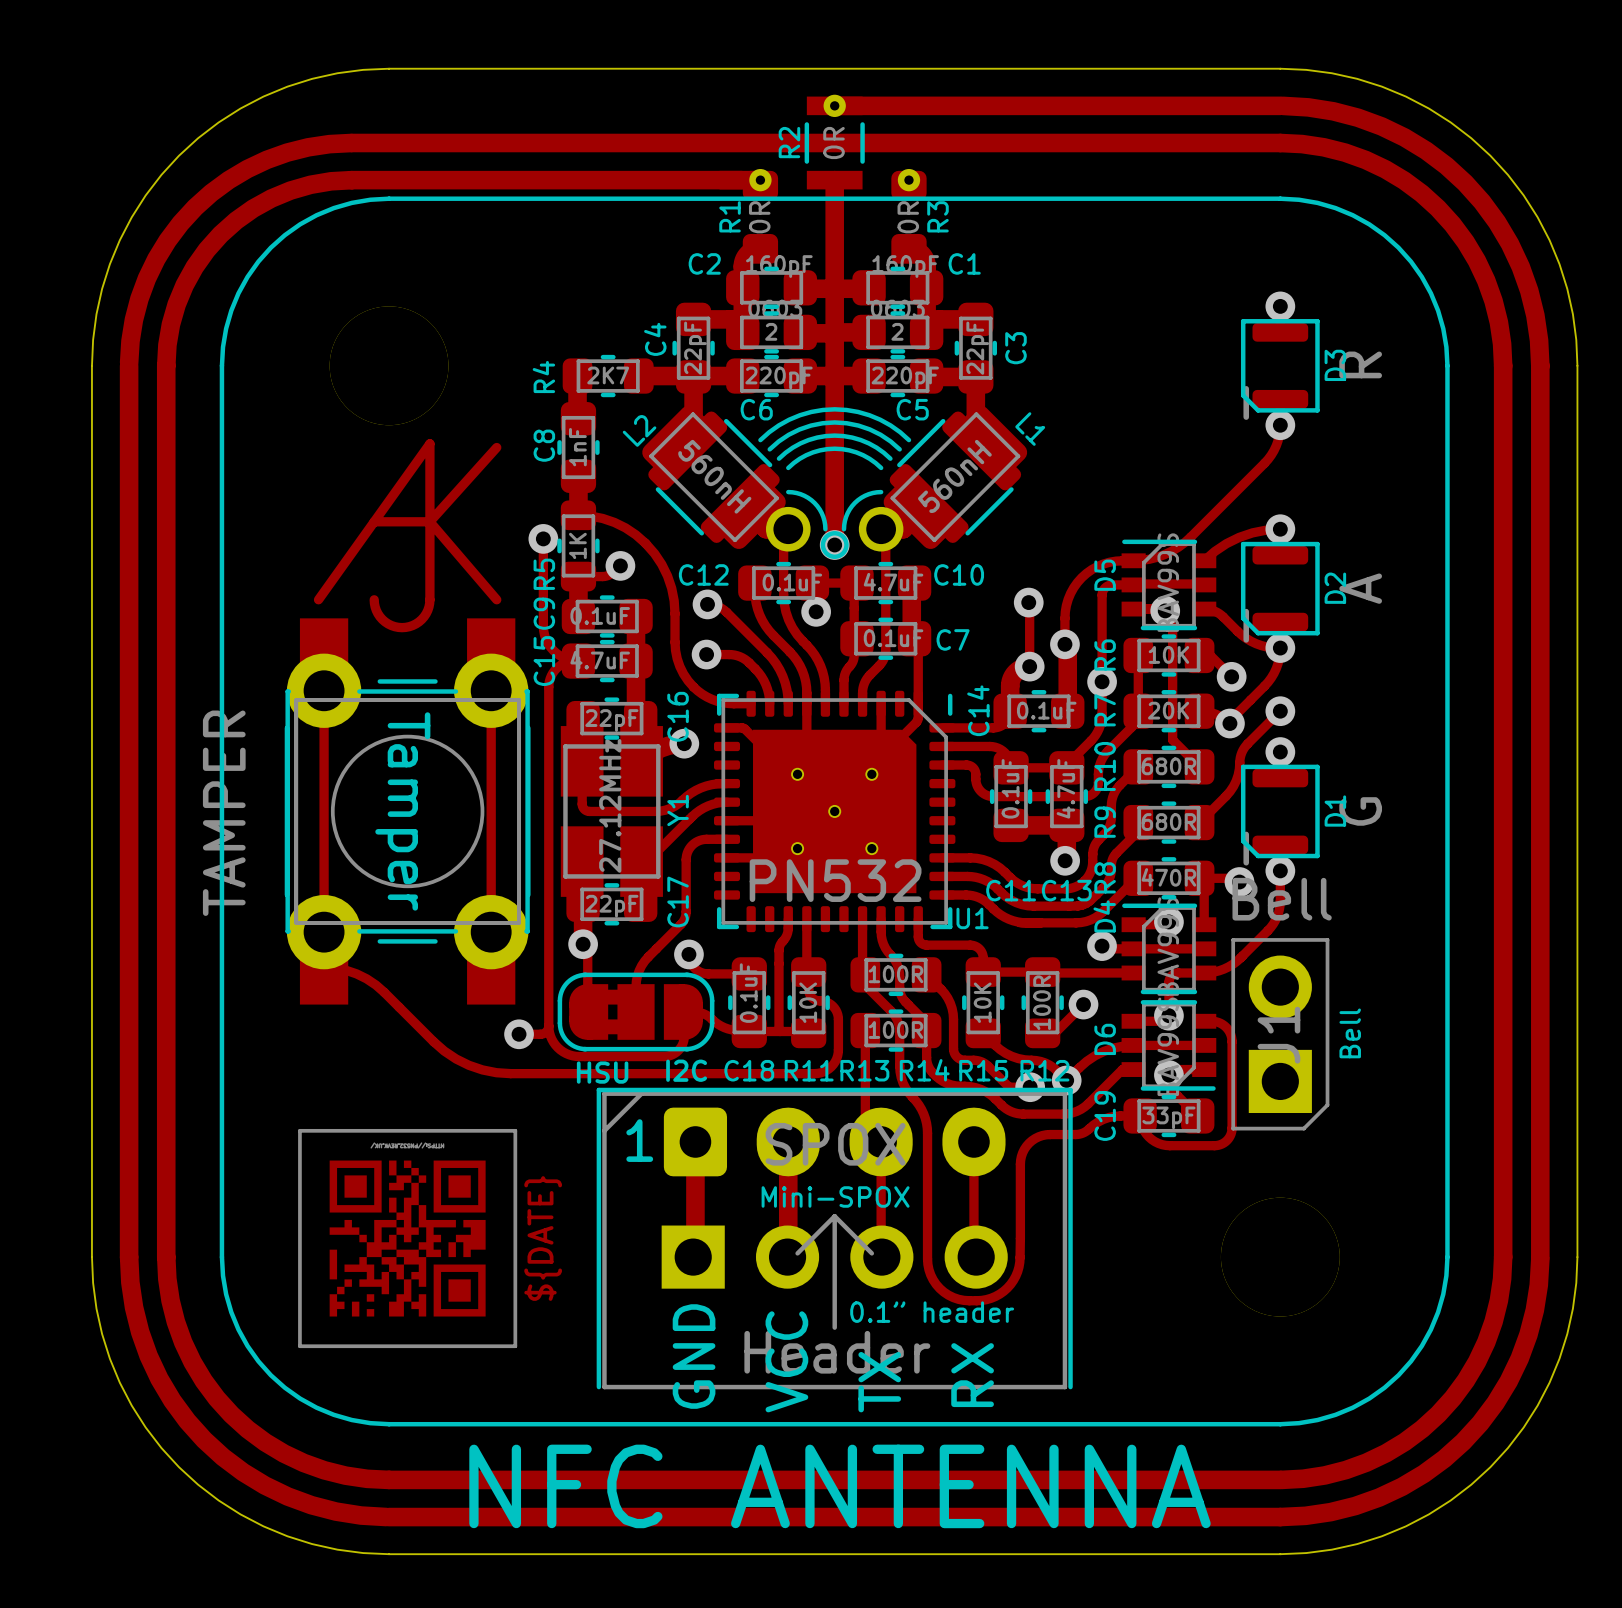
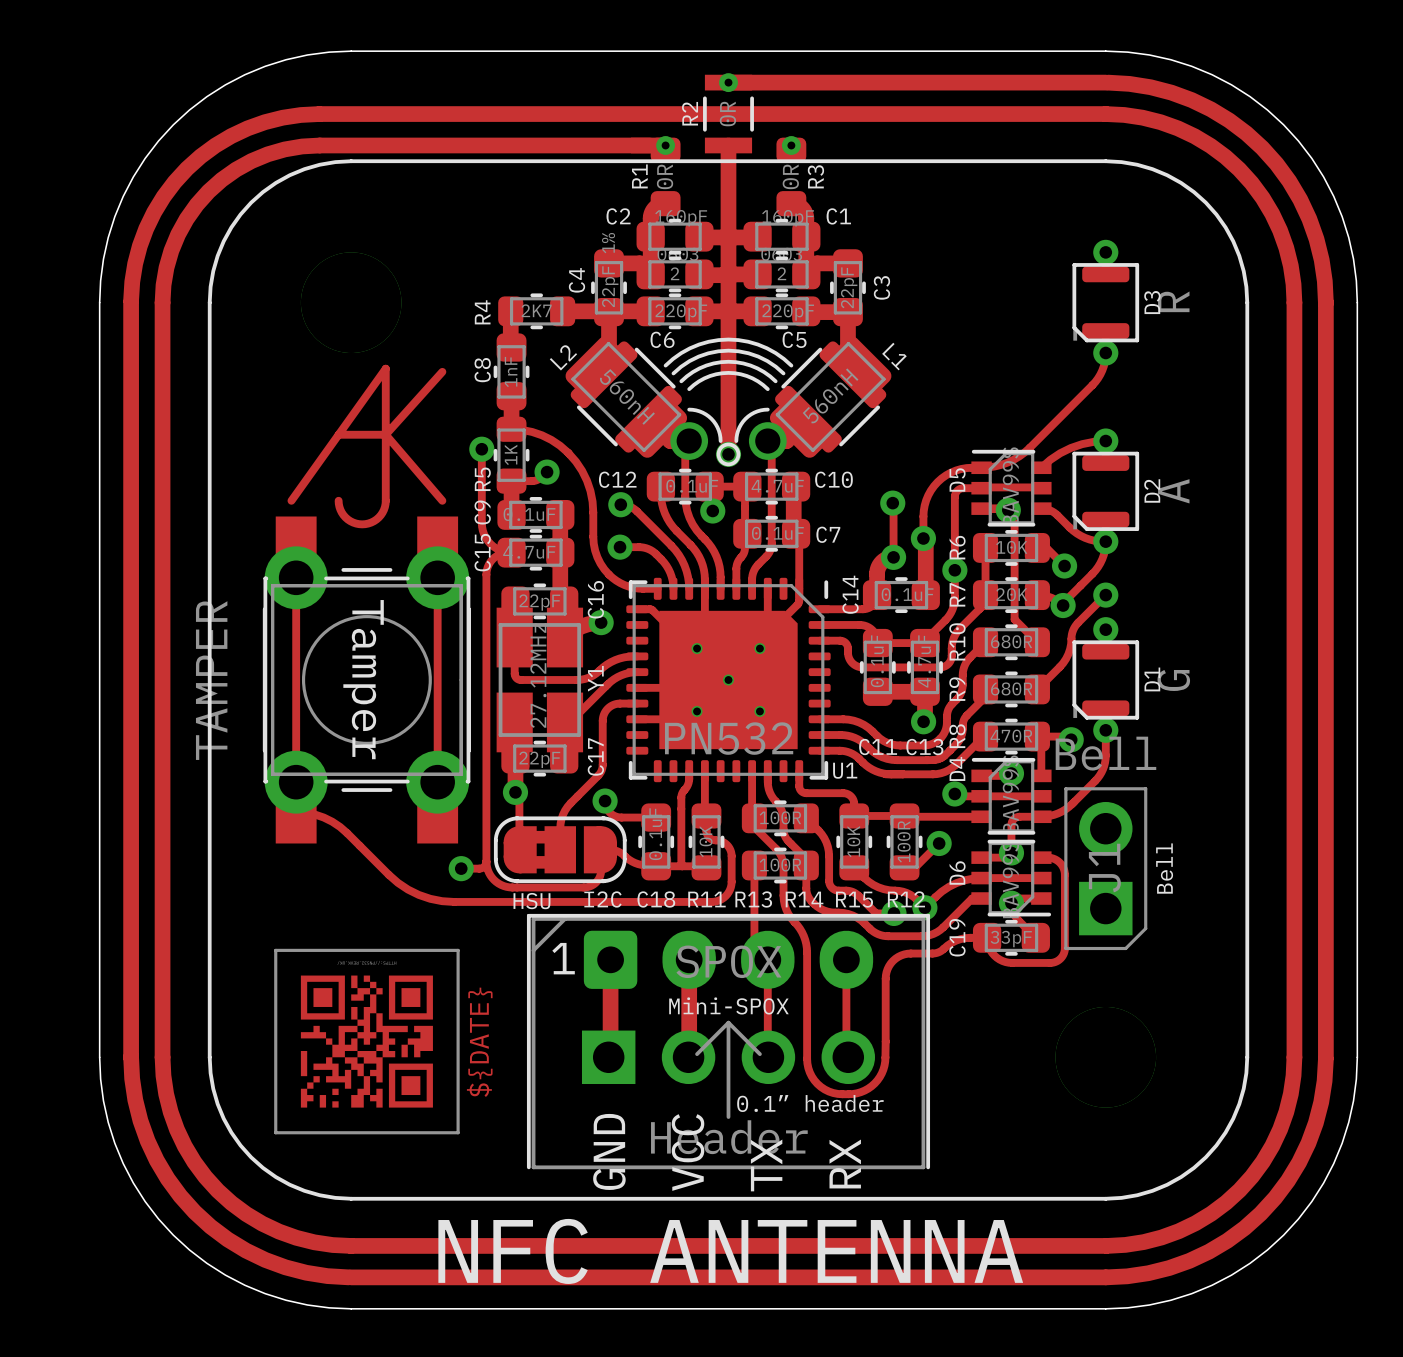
C4 value: 22pF (695, 348) -> 22pF 1% (610, 270)

